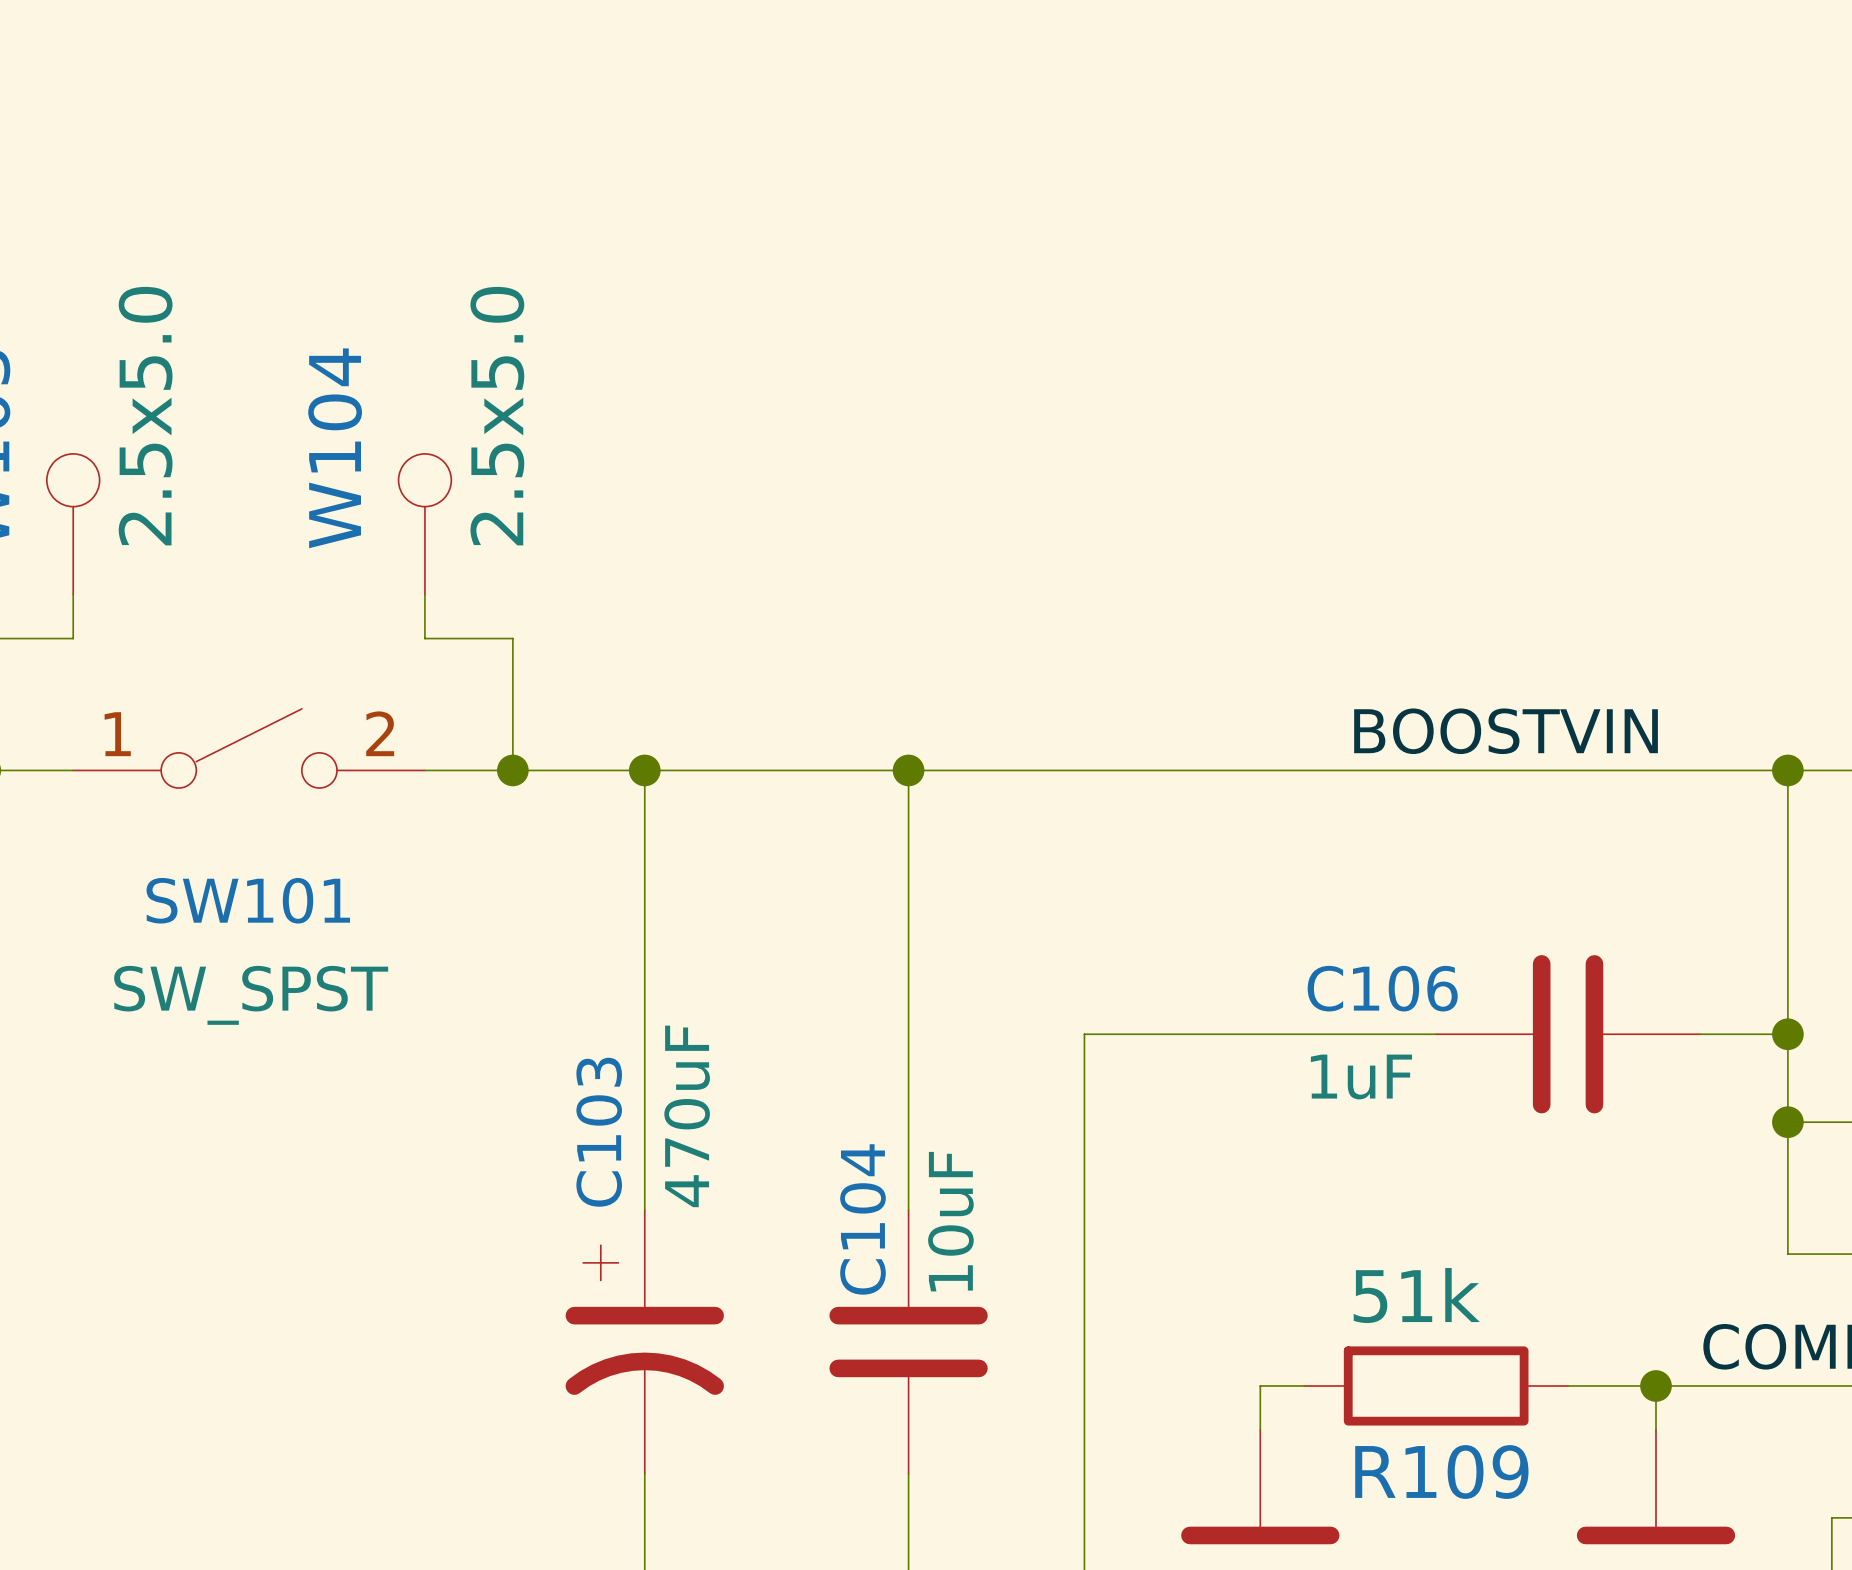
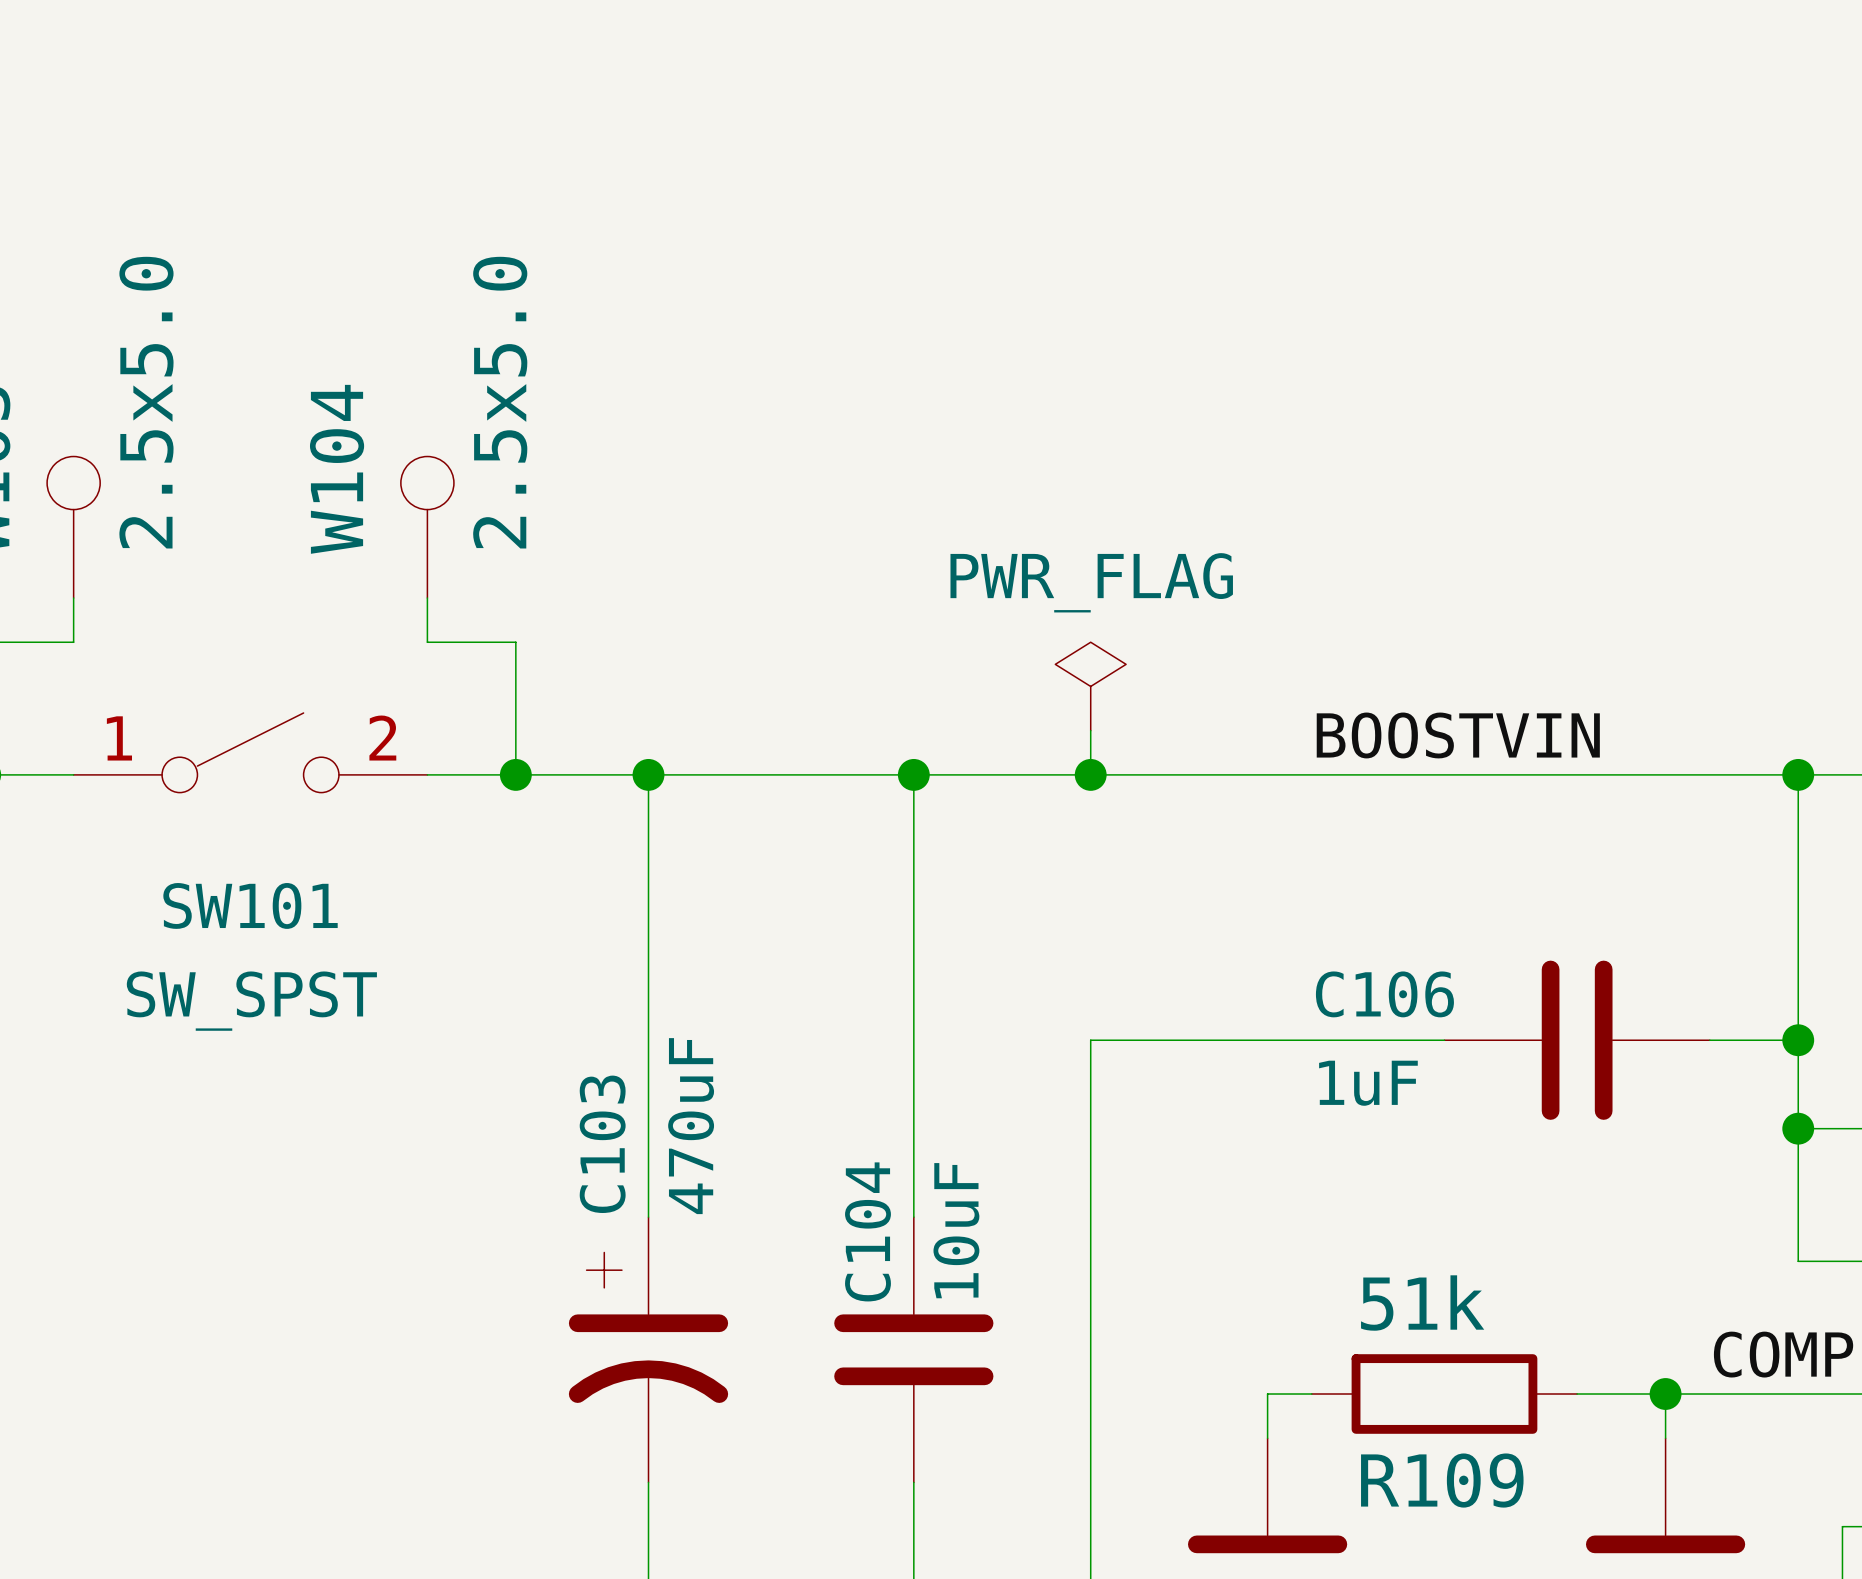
power symbol: none -> PWR_FLAG (1090, 686)
wire: none -> (1090, 730) (1090, 774)
label position: BOOSTVIN (1506, 731) -> BOOSTVIN (1458, 735)
junction: none -> (1090, 774)

